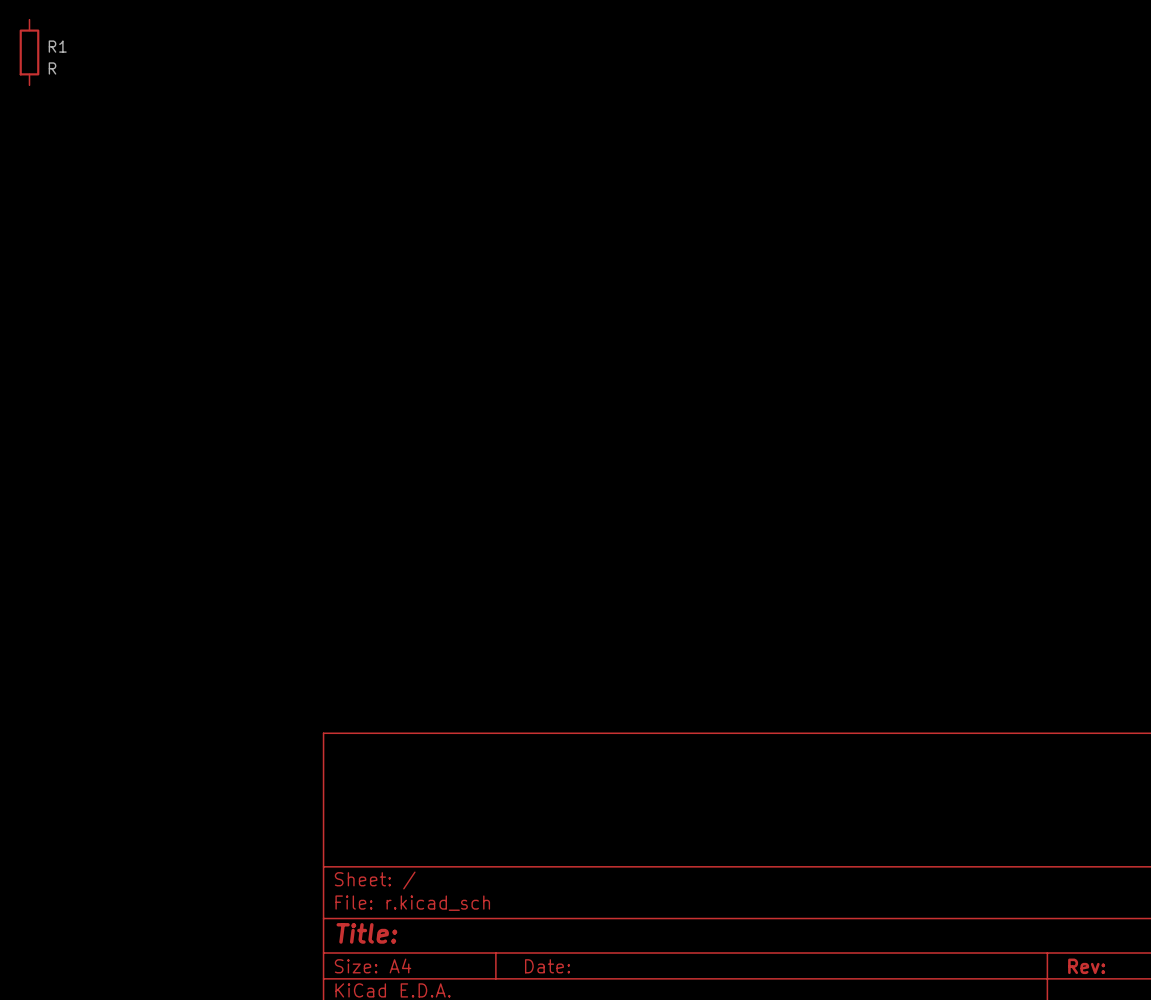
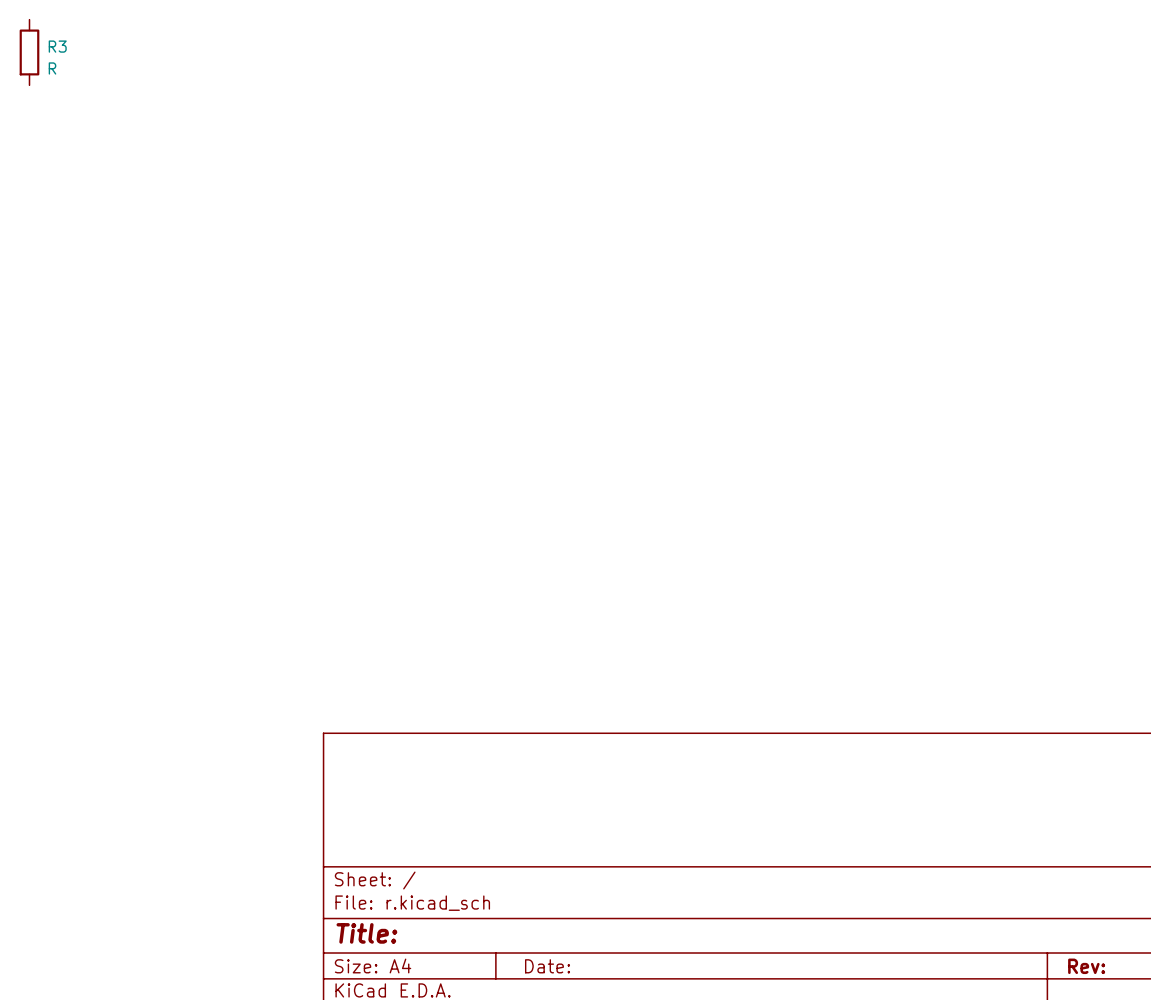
R1 name: R1 (57, 46) -> R3 (57, 46)

